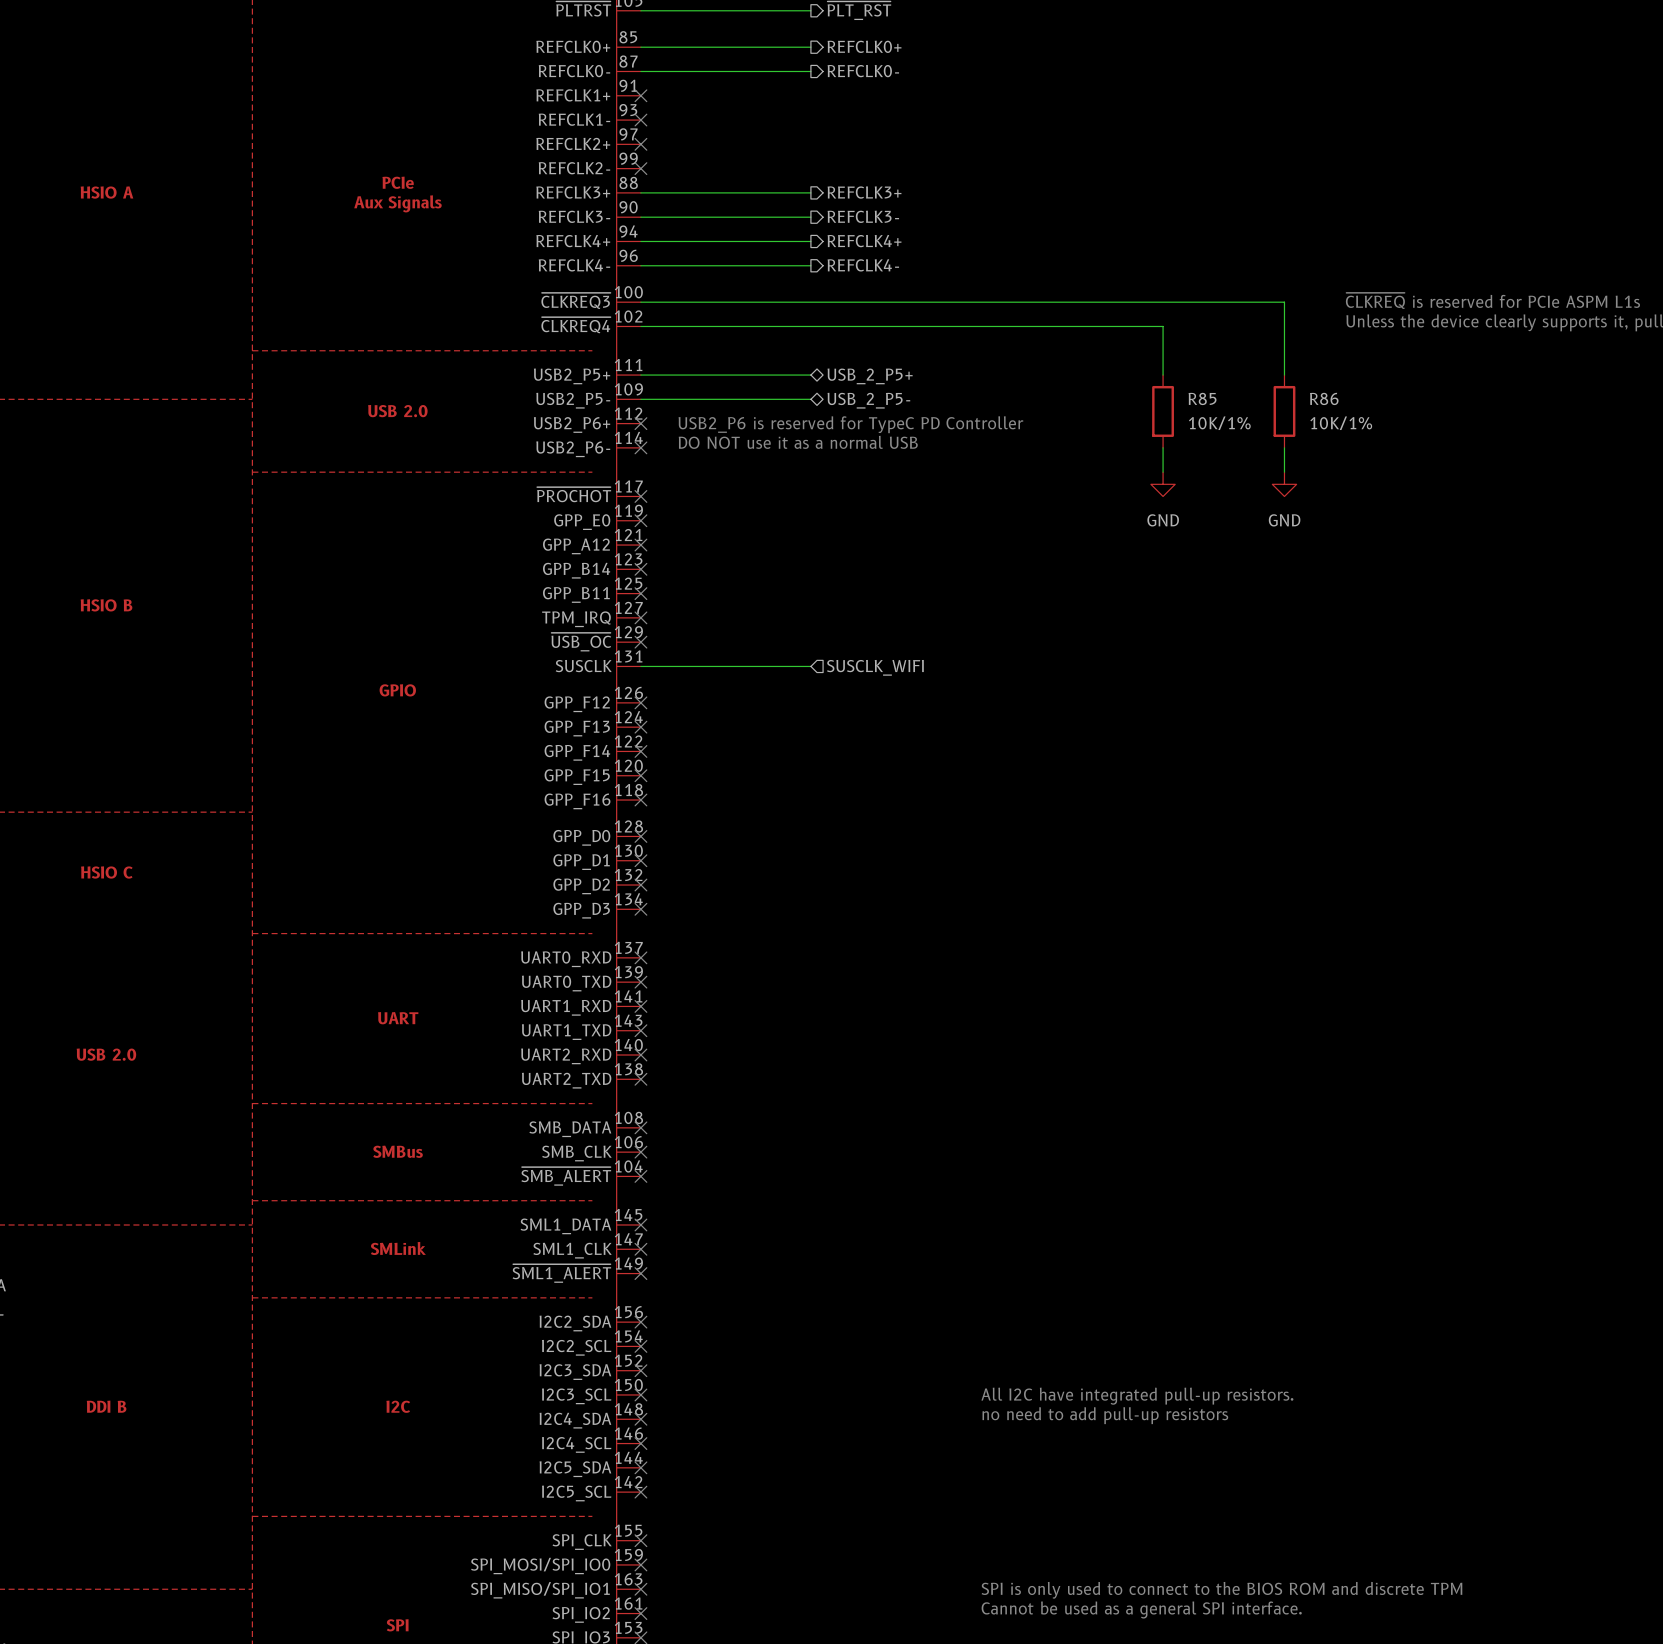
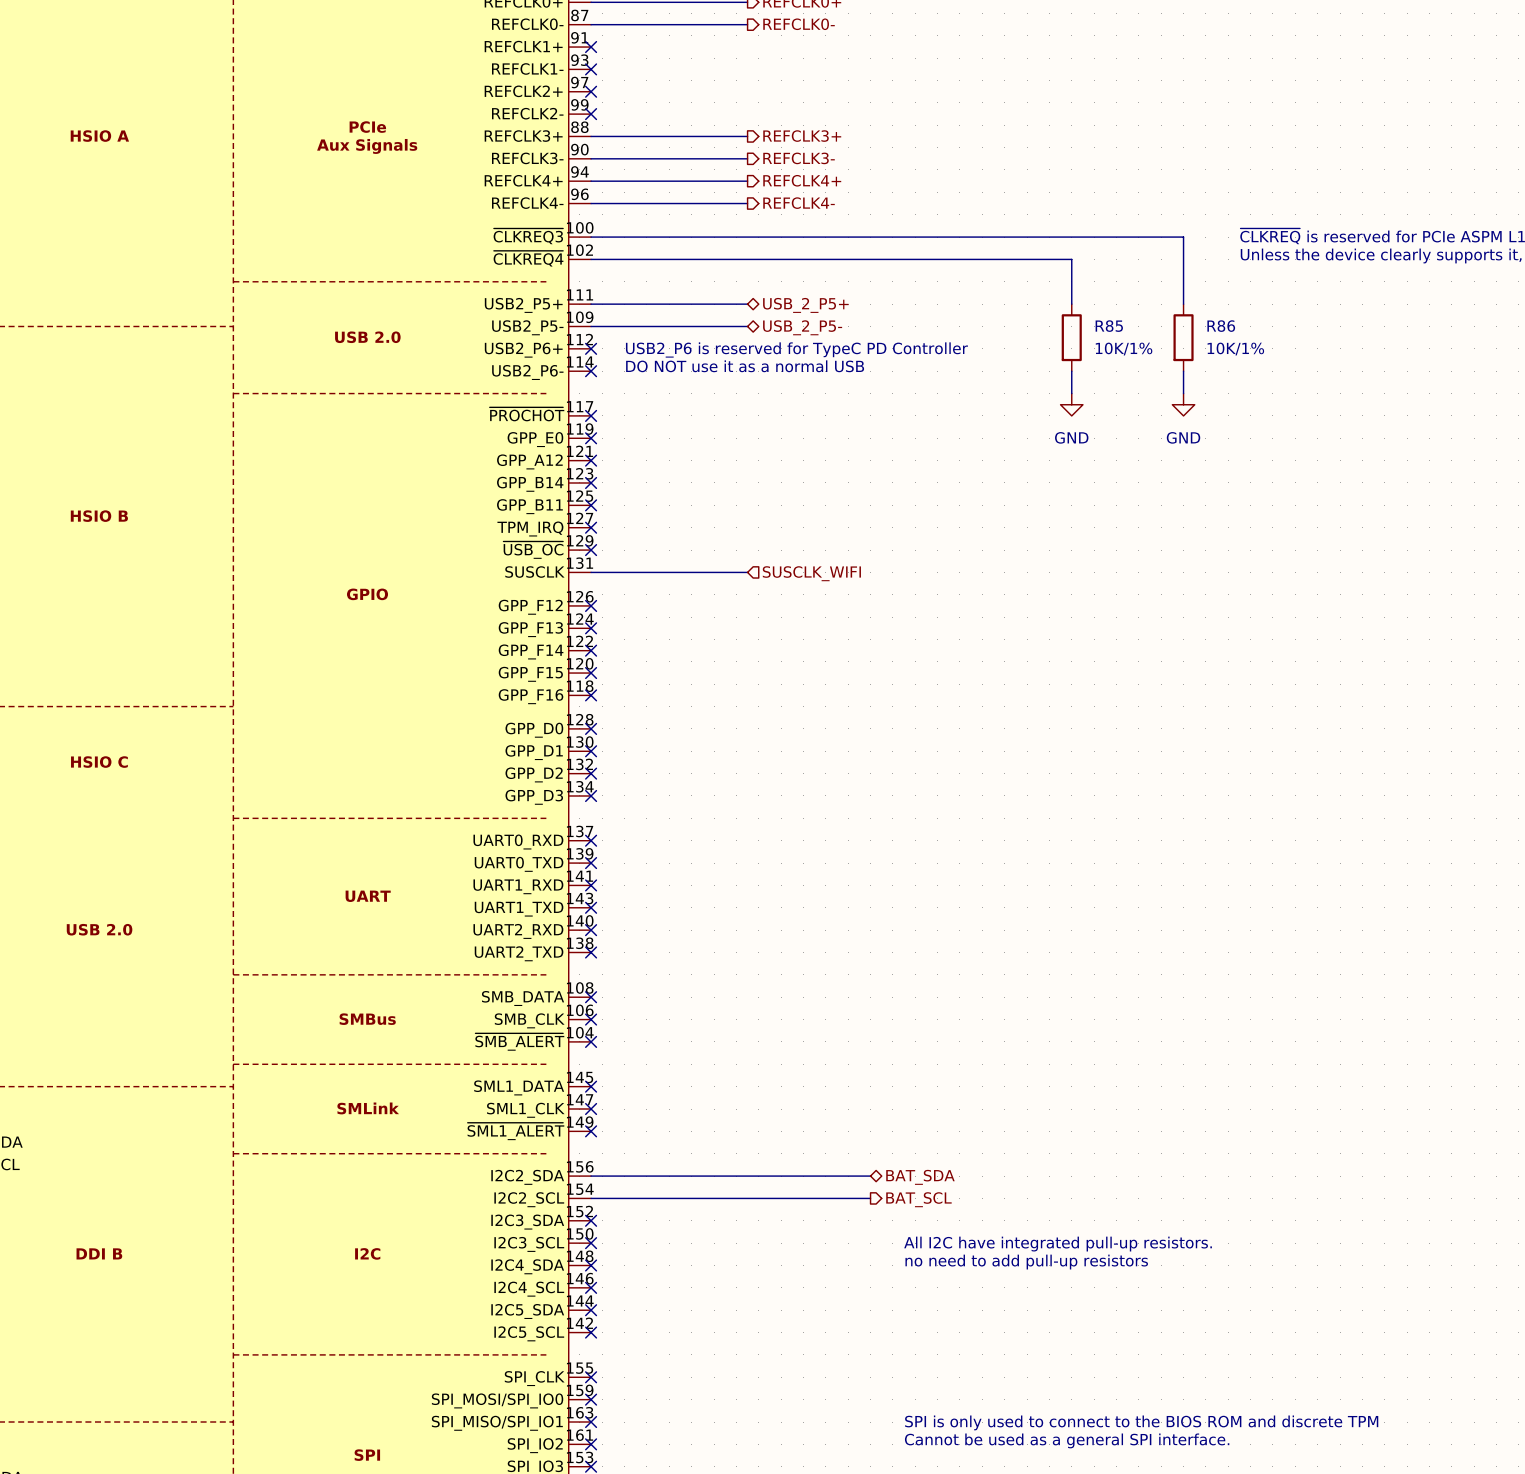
wire: none -> (591, 1176) (870, 1176)
no-connect mark: (640, 1322) -> none
hierarchical label: none -> BAT_SDA (920, 1177)
wire: none -> (591, 1198) (870, 1198)
no-connect mark: (640, 1346) -> none
hierarchical label: none -> BAT_SCL (918, 1199)

